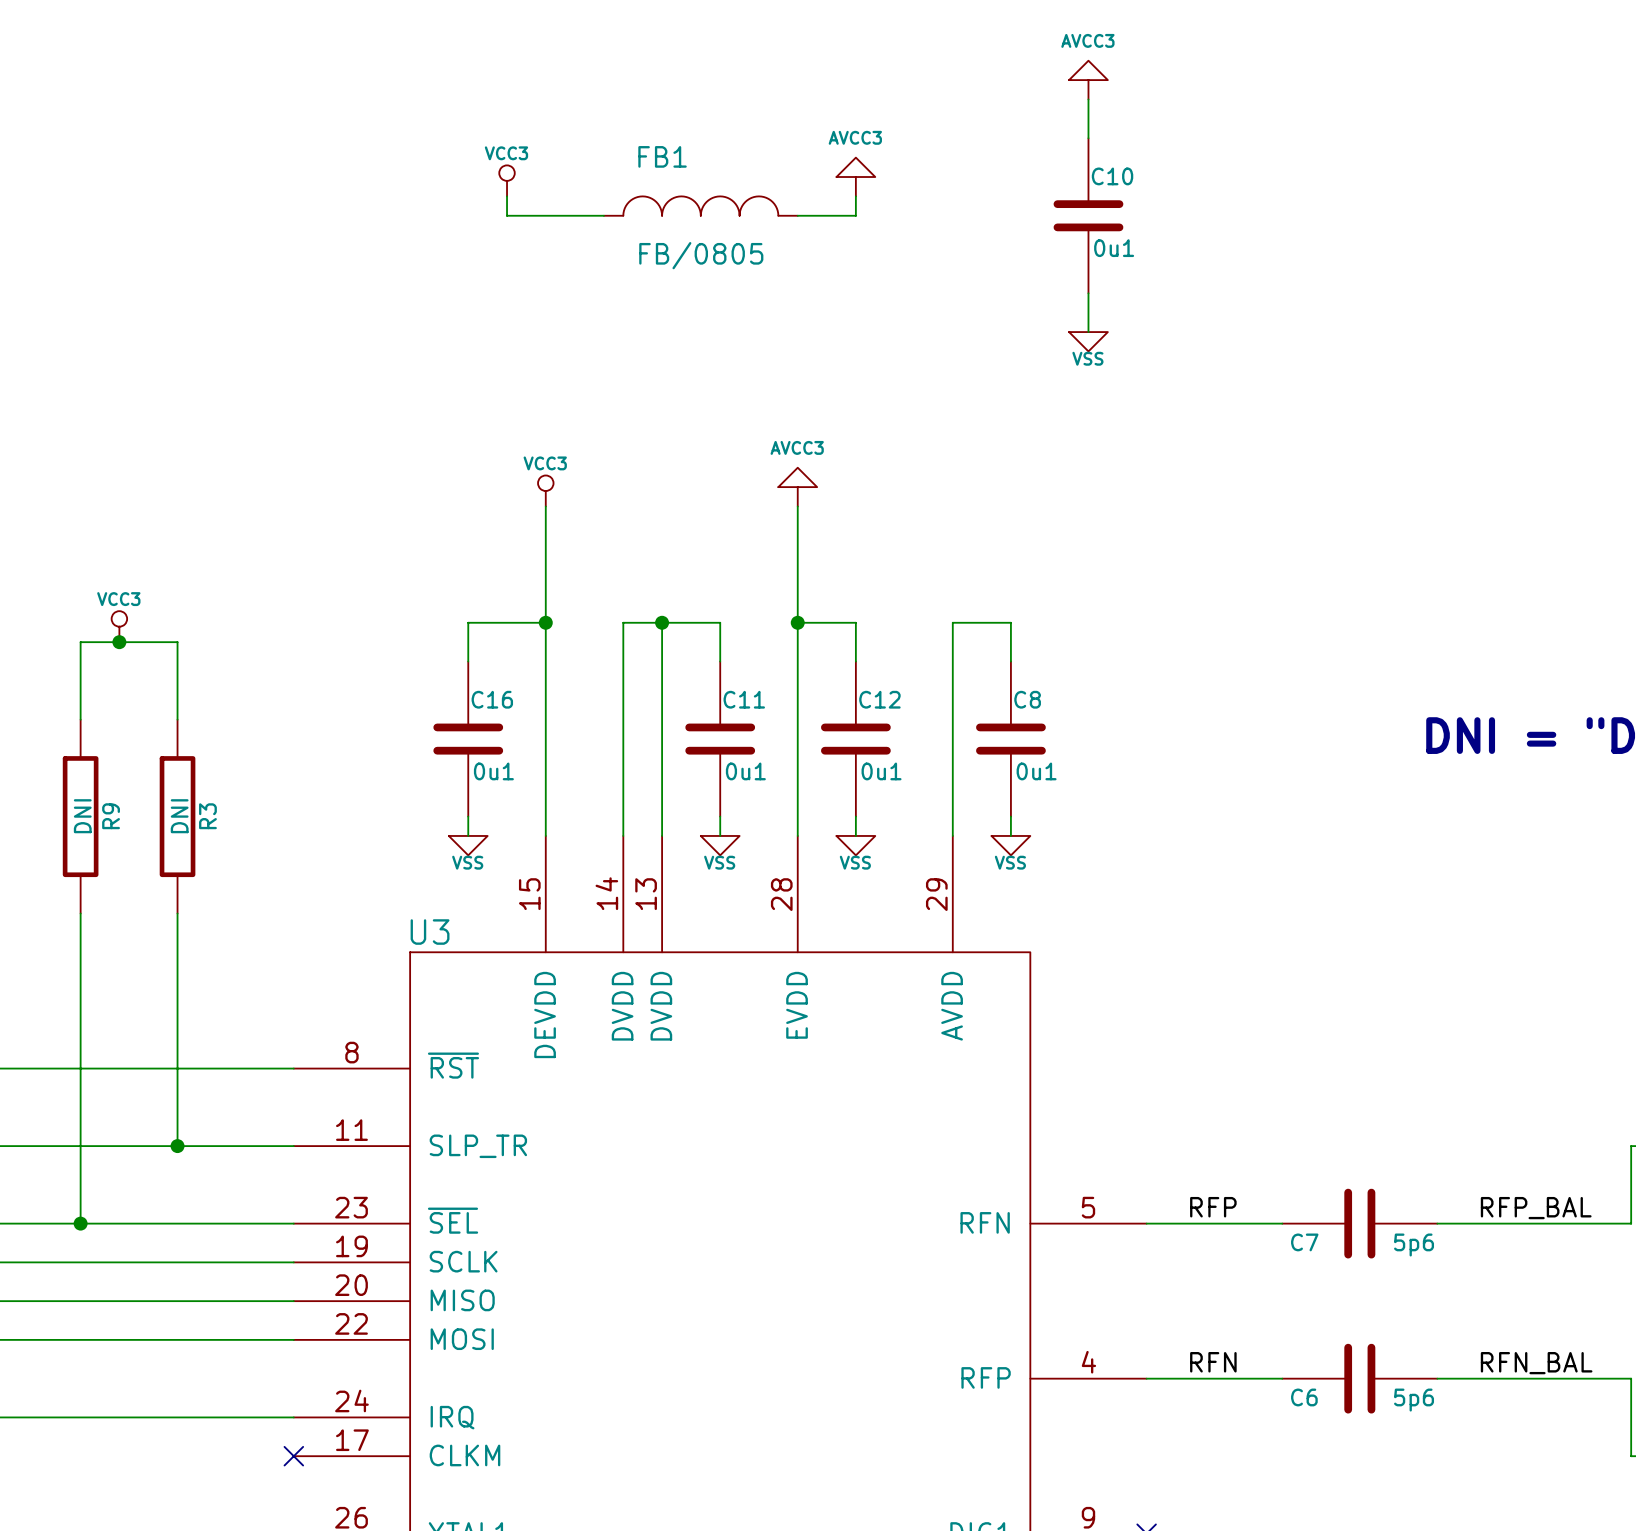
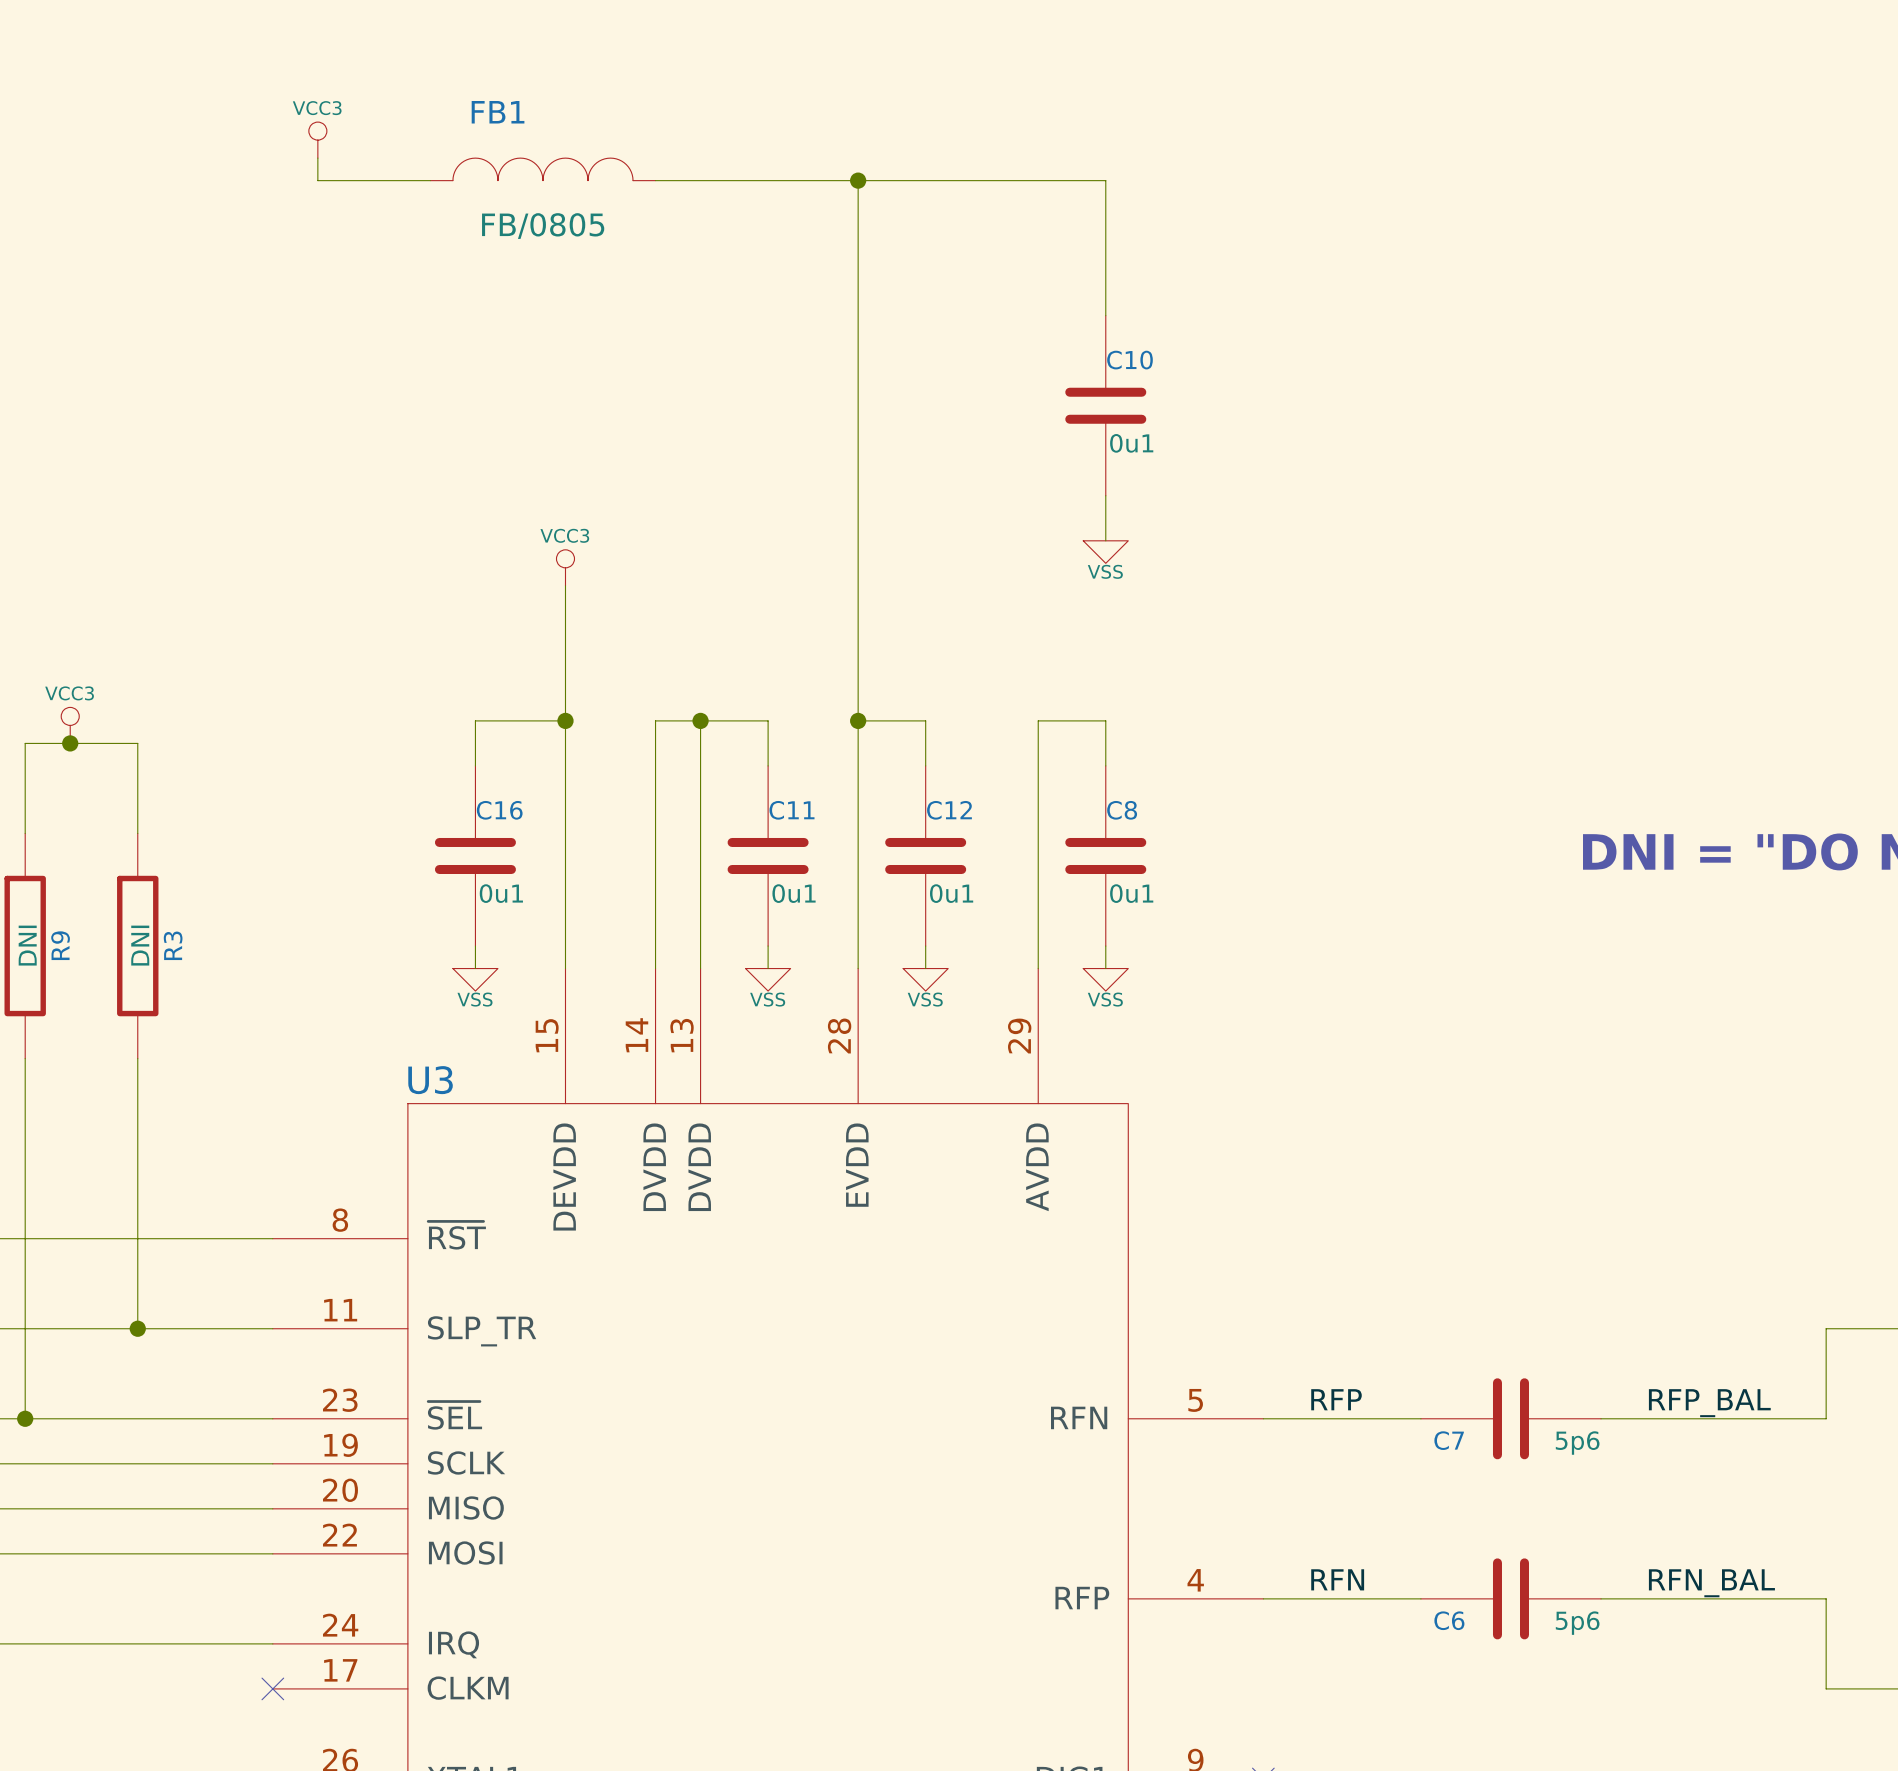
power symbol: AVCC3 (1088, 80) -> none
wire: (1088, 99) (1088, 138) -> none
wire: none -> (655, 180) (1105, 180) (1105, 315)
wire: none -> (858, 180) (858, 585)
junction: none -> (858, 180)
power symbol: AVCC3 (855, 177) -> none
power symbol position: VCC3 (507, 180) -> VCC3 (317, 140)
wire: (507, 196) (507, 215) (603, 215) -> (317, 158) (317, 180) (430, 180)
wire: (855, 196) (855, 215) (797, 215) -> none
FB1 position: (700, 206) -> (542, 169)
C10 position: (1088, 215) -> (1105, 405)
wire: (1088, 293) (1088, 332) -> (1105, 495) (1105, 540)
power symbol position: VSS (1088, 341) -> VSS (1105, 552)
power symbol: AVCC3 (797, 487) -> none

